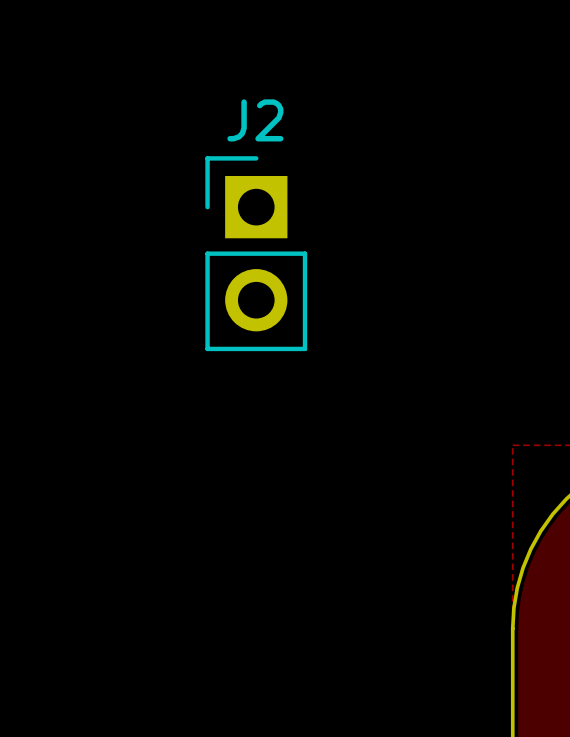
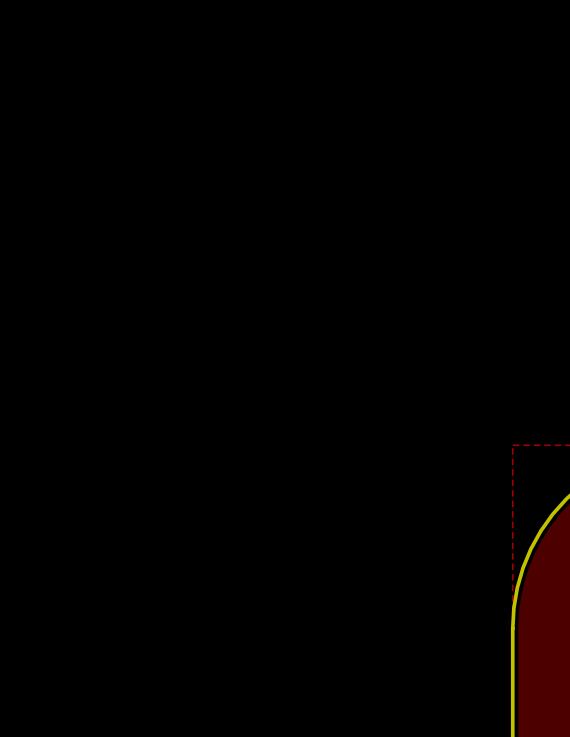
J2: (256, 253) -> none

